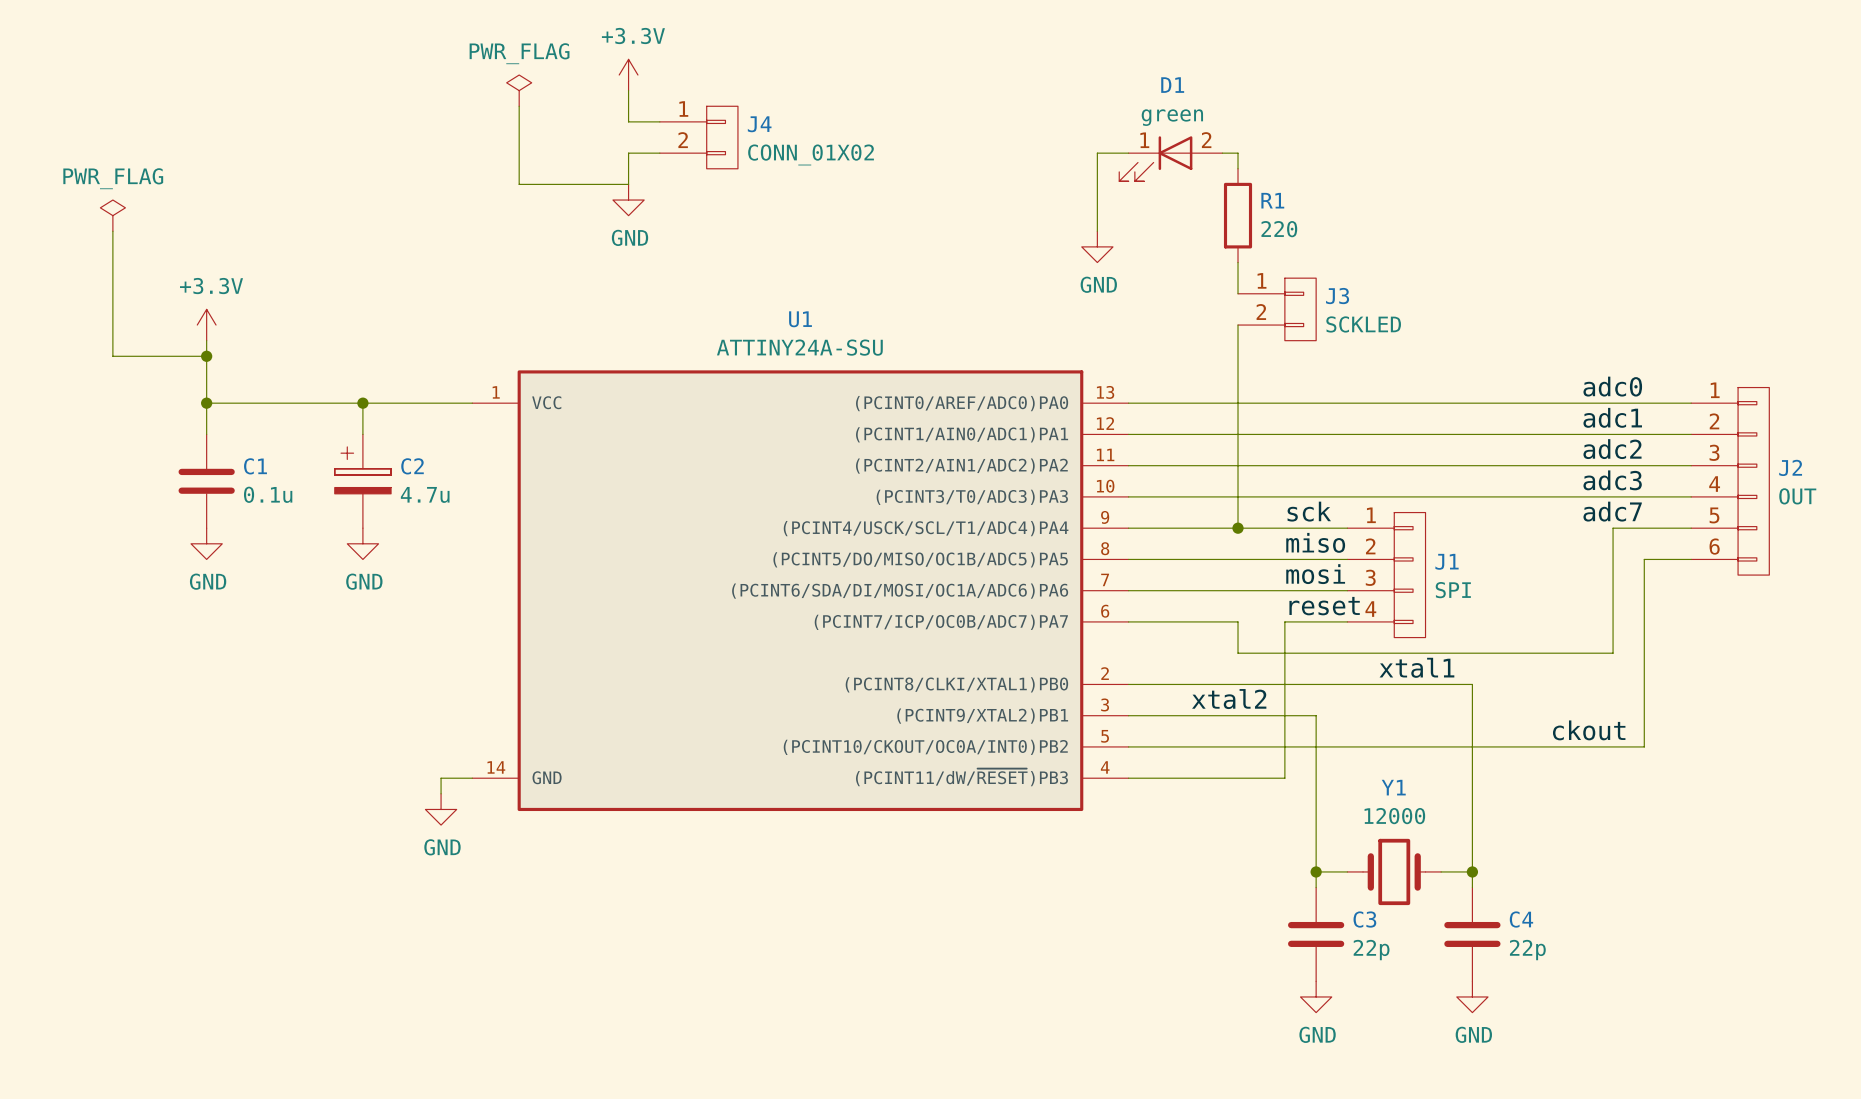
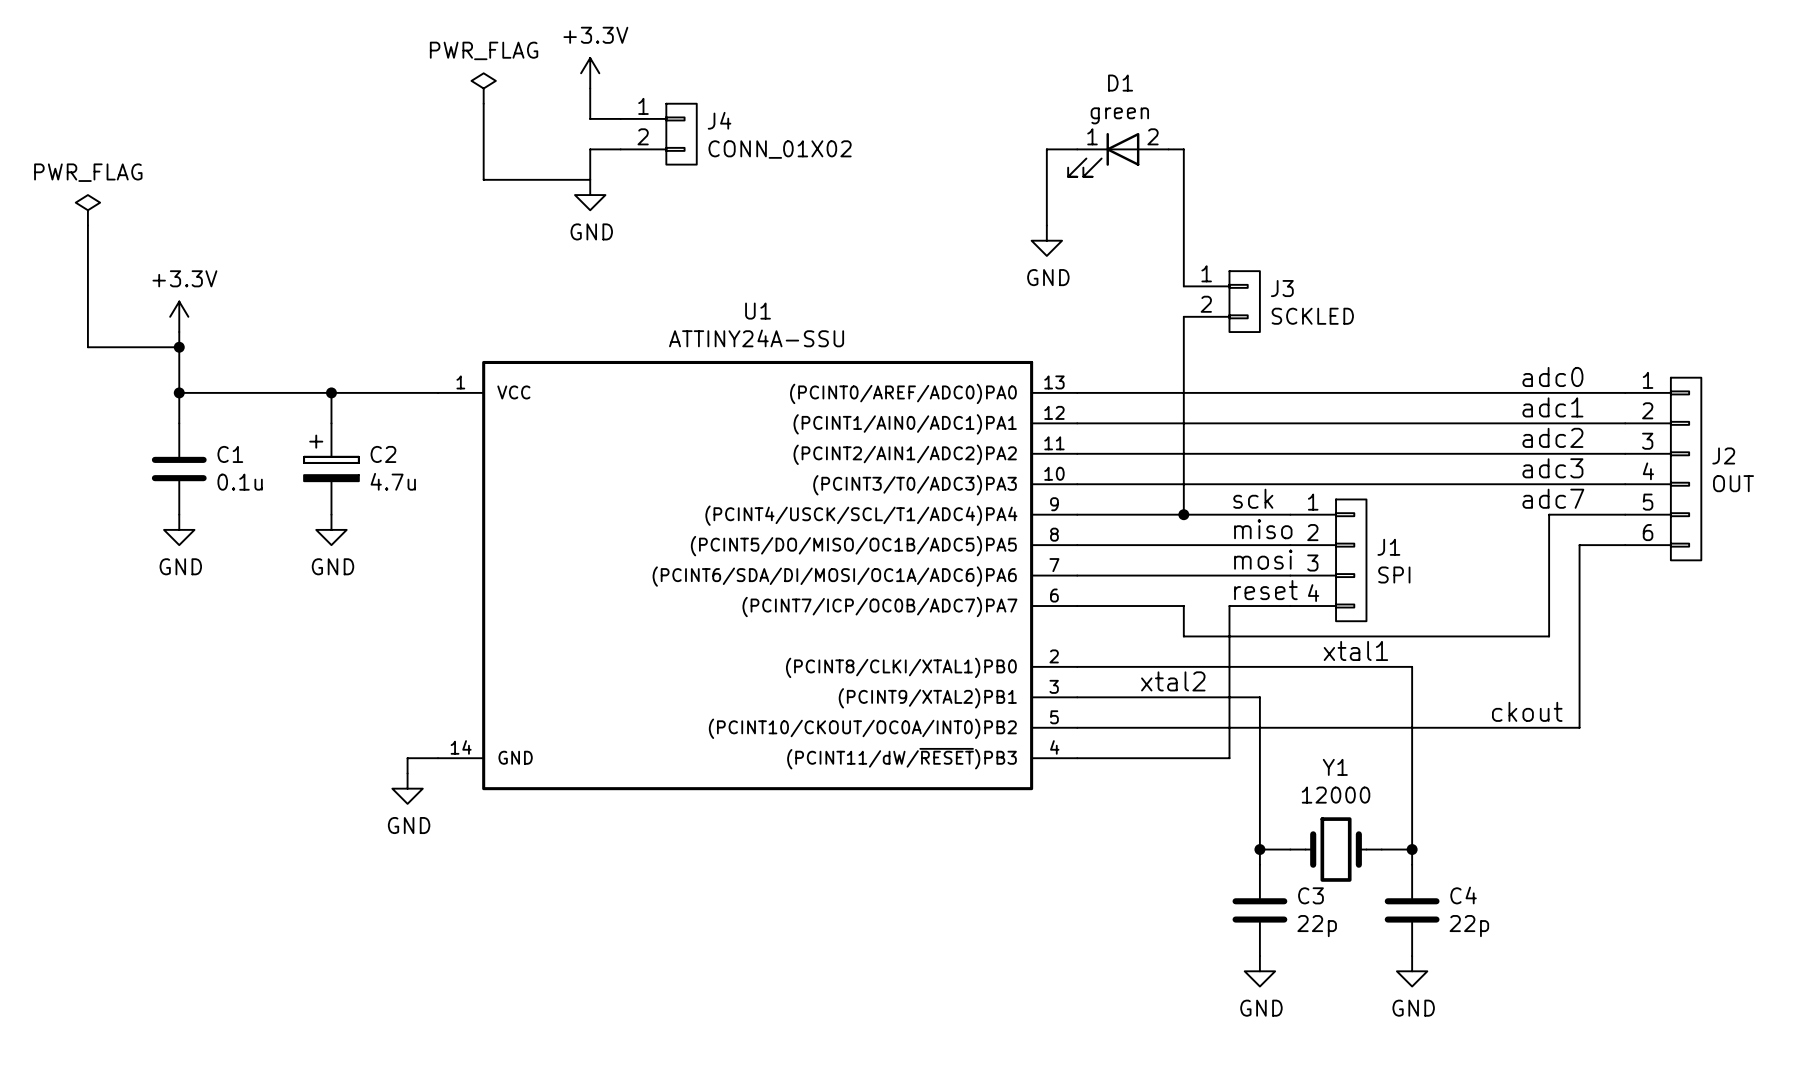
wire: none -> (1183, 164) (1183, 255)
R1: 220 (1238, 215) -> none

